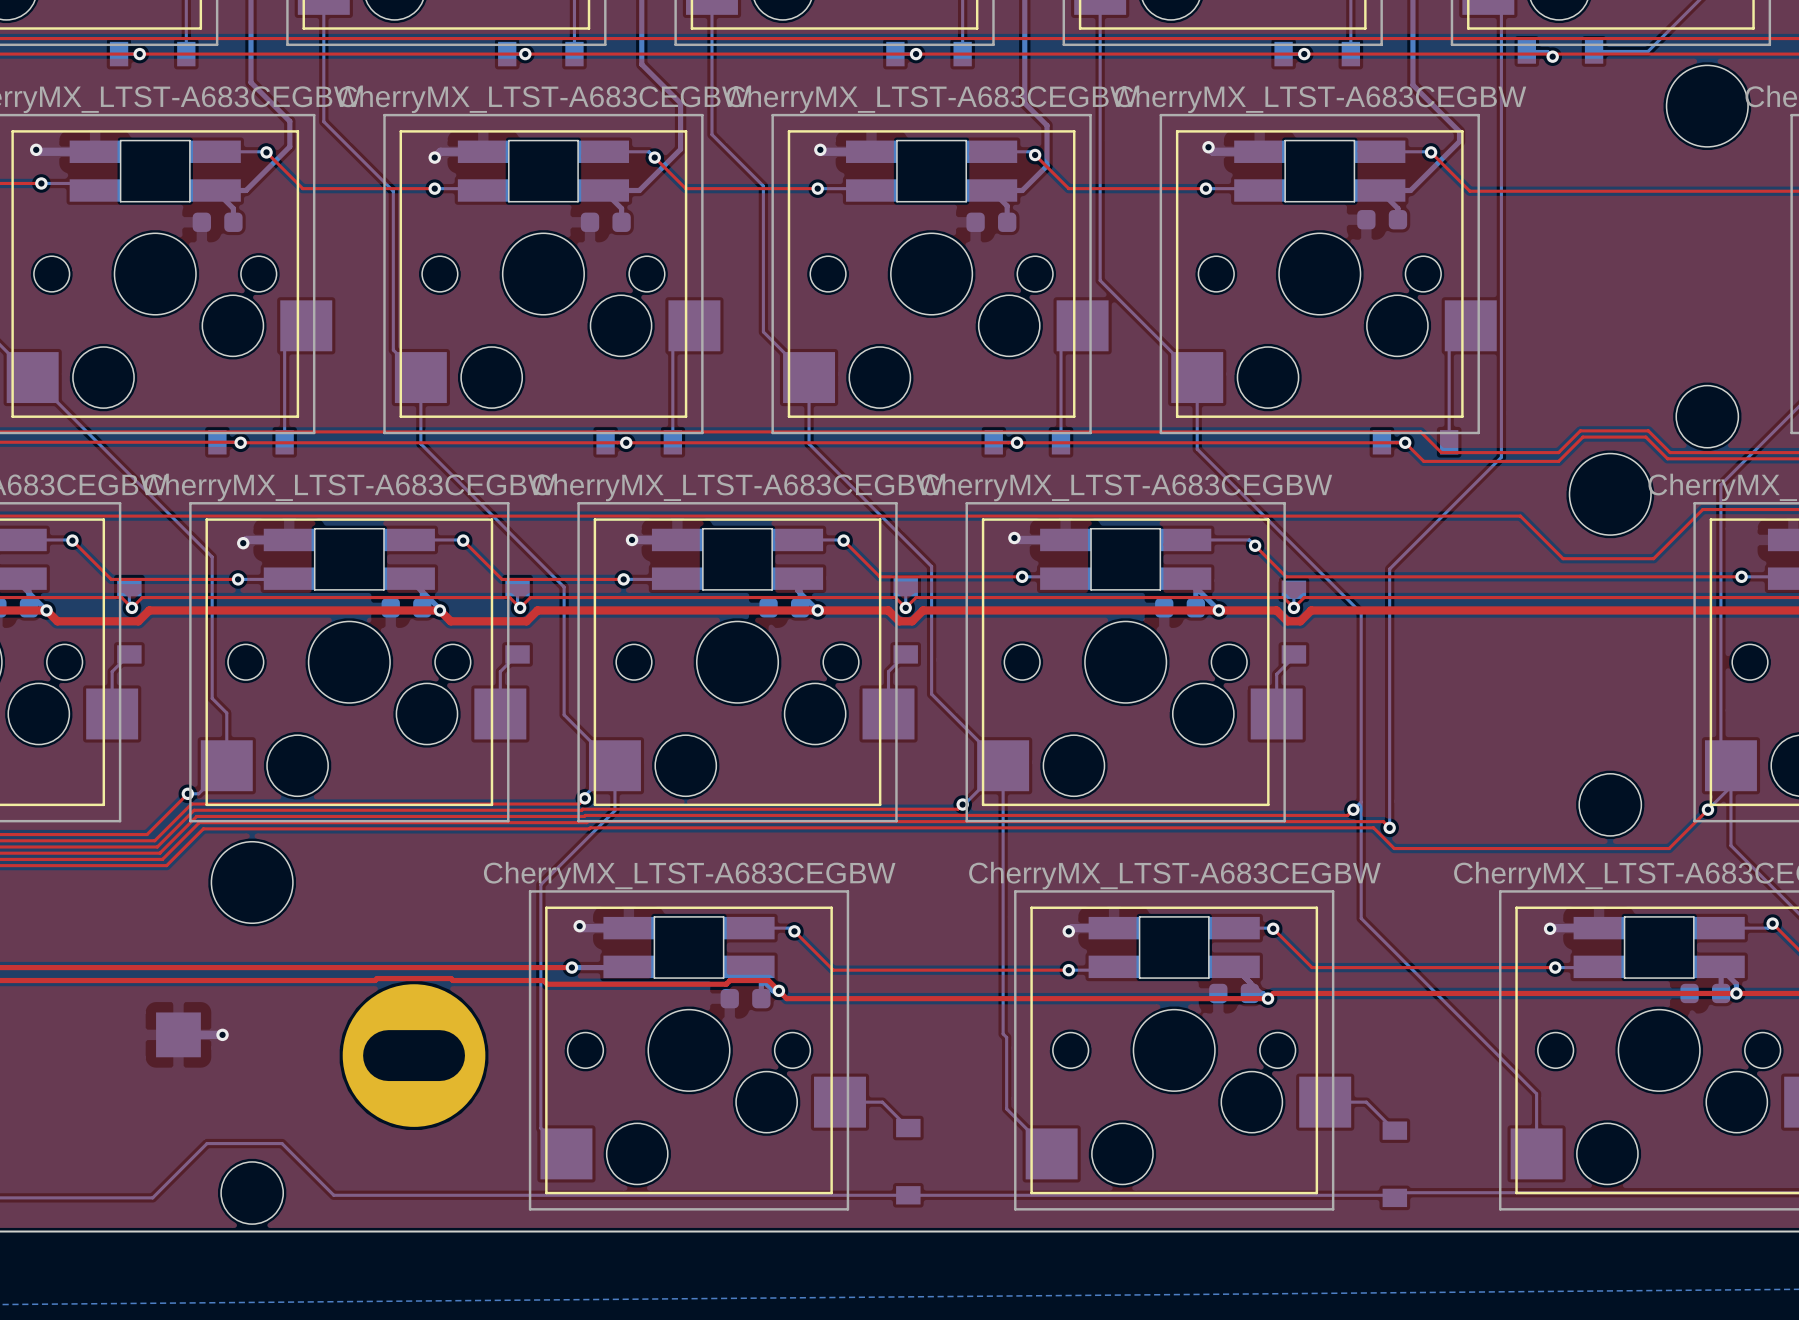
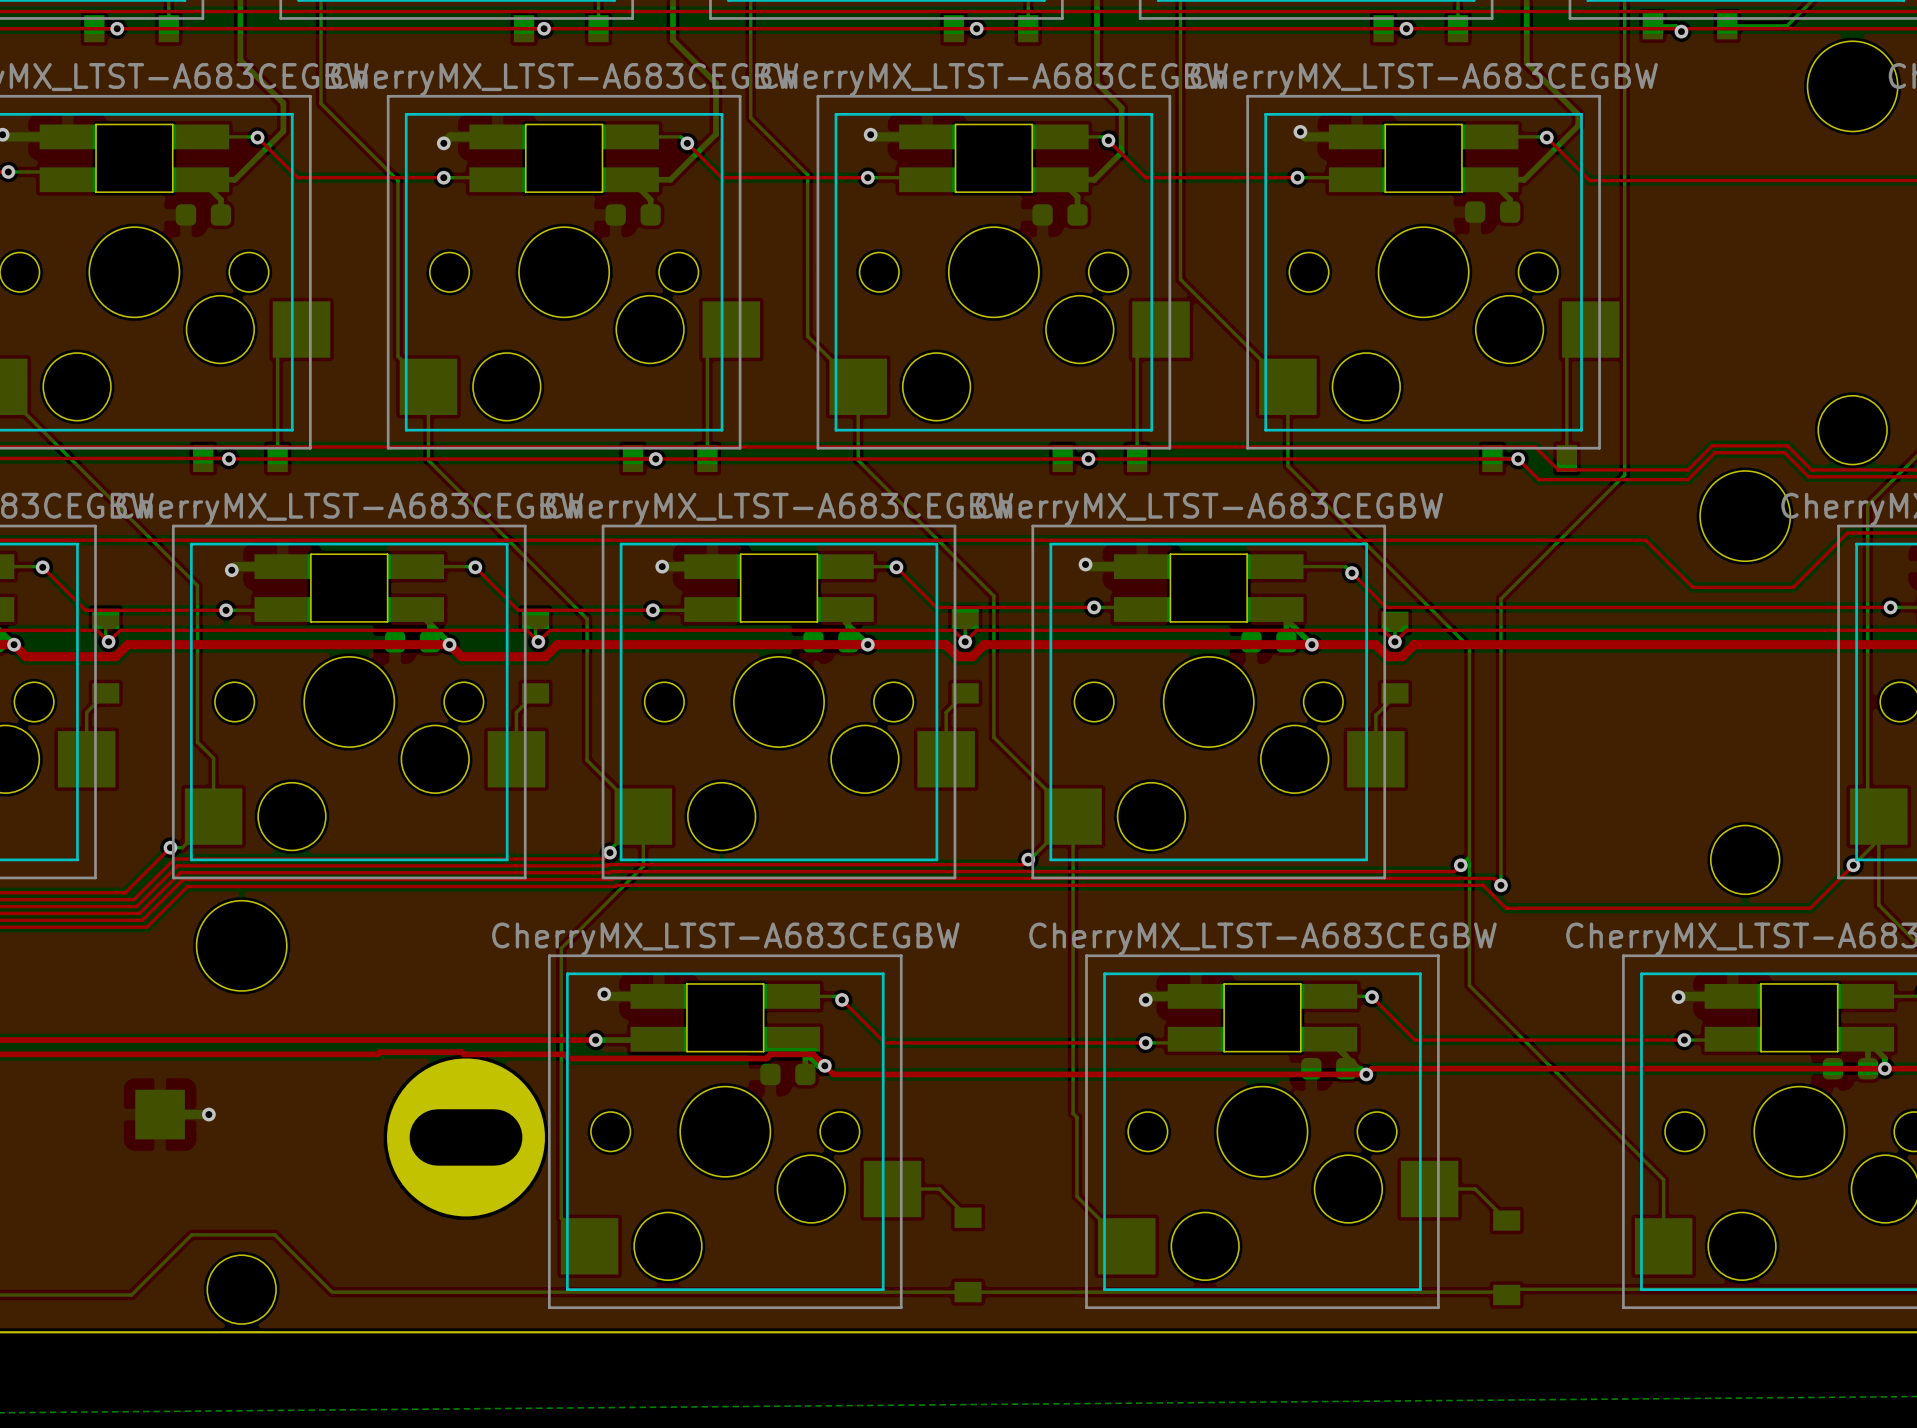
part position: (414, 1055) -> (466, 1137)

